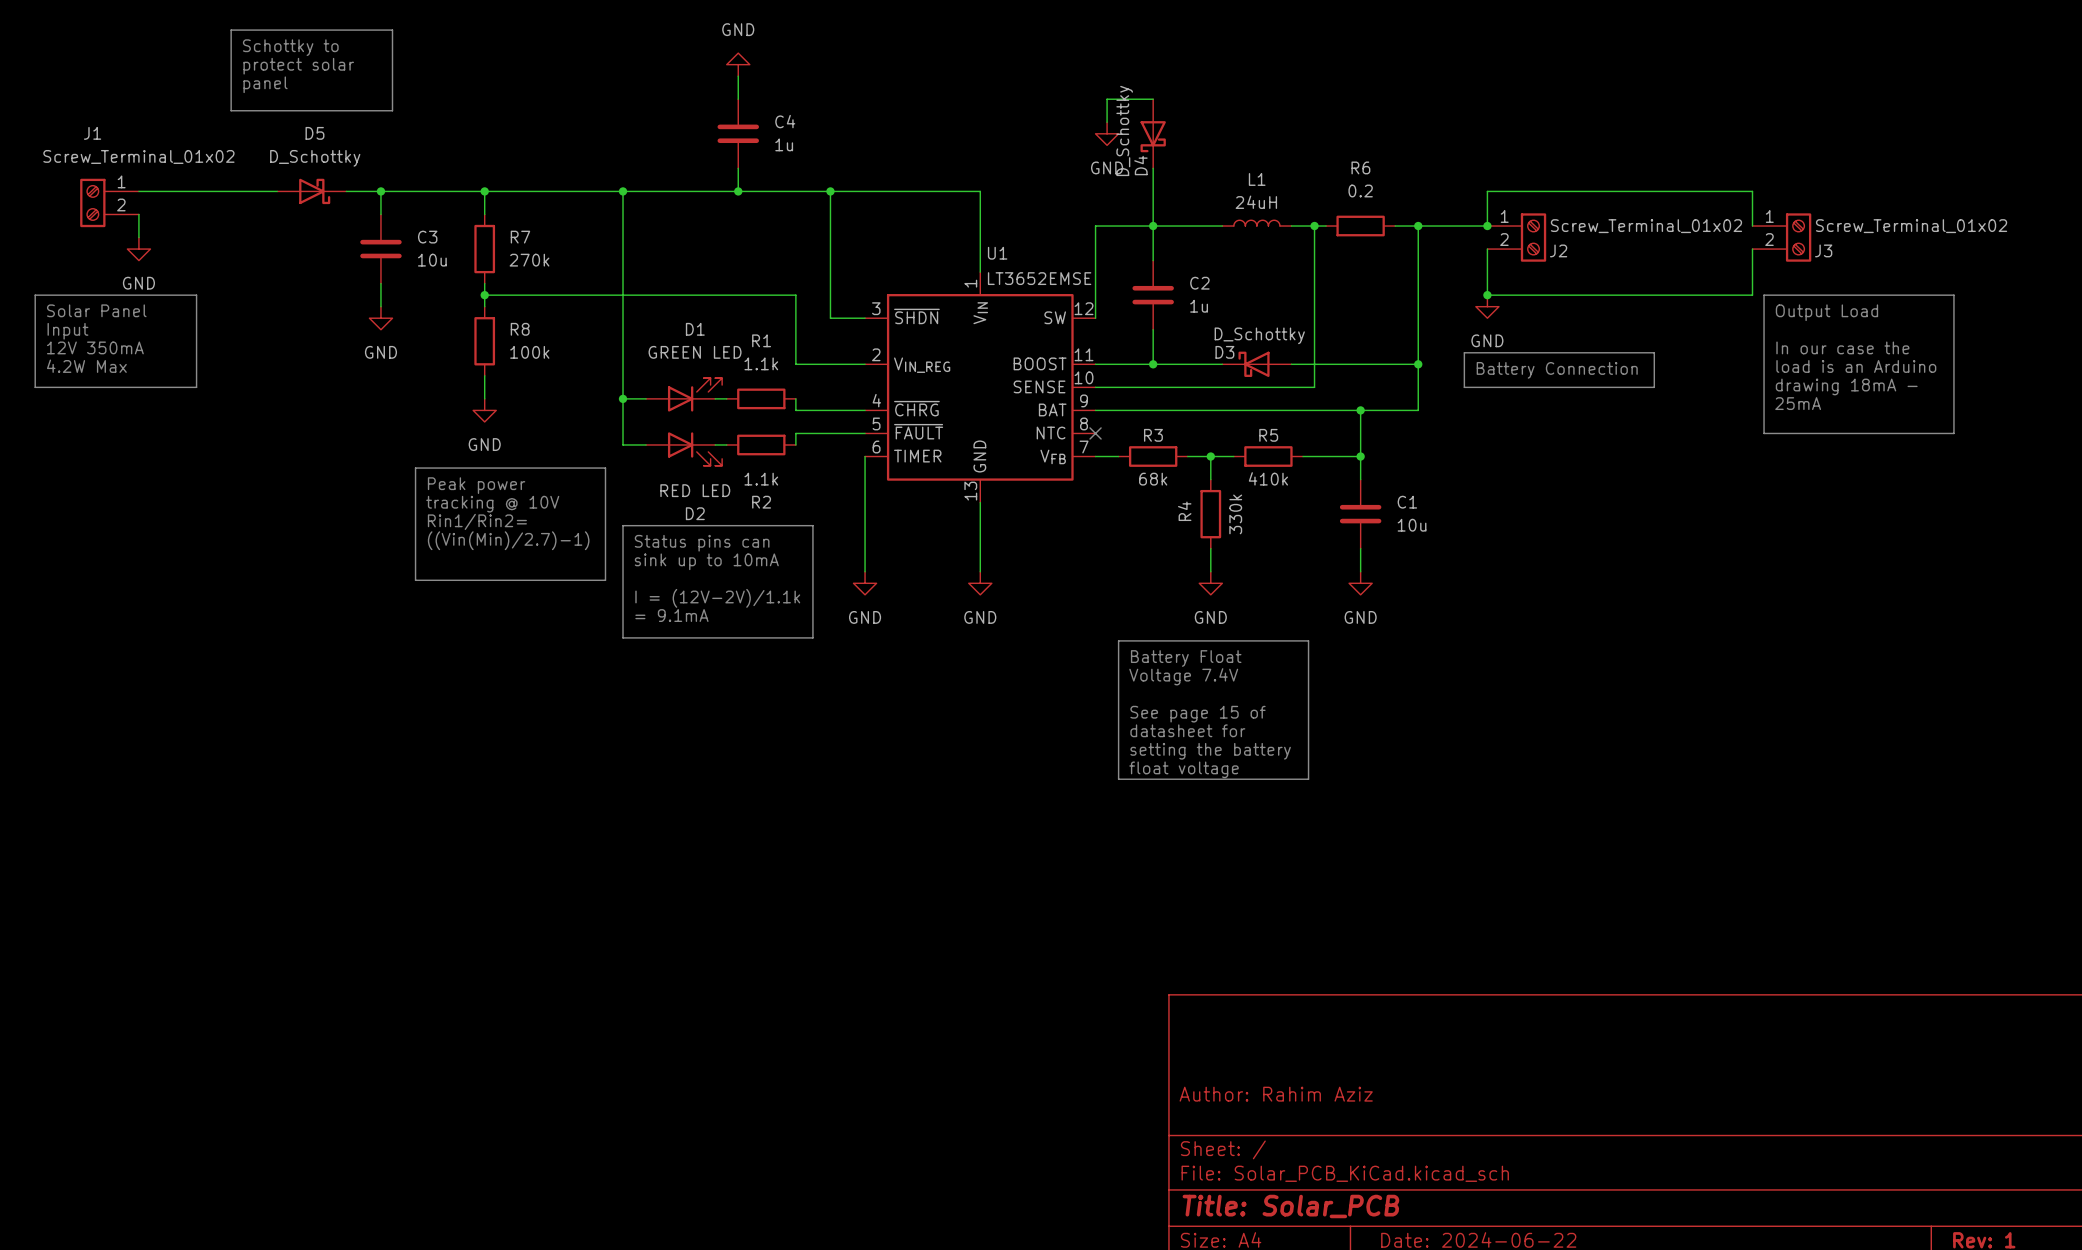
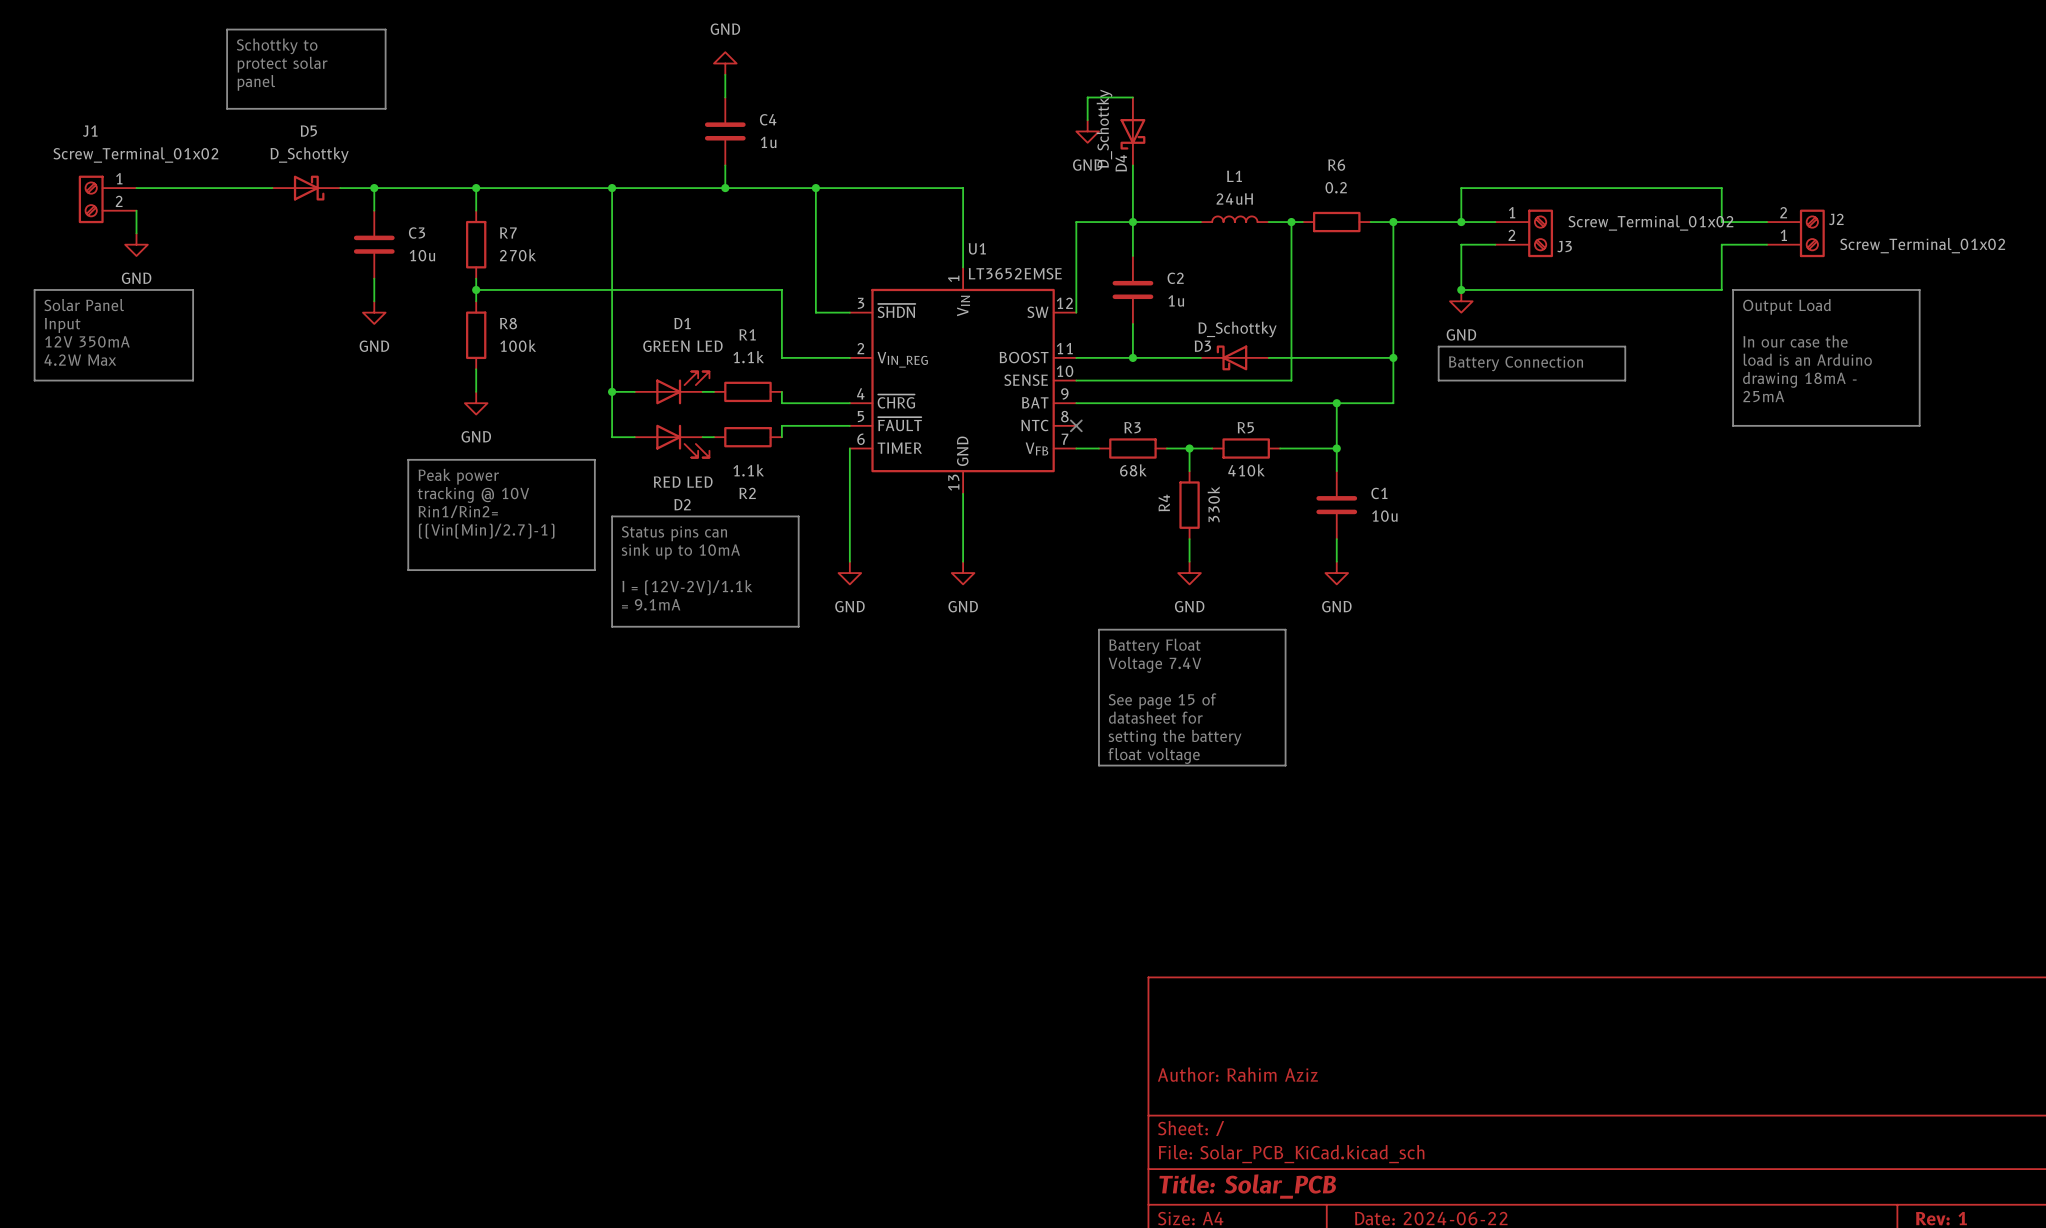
J2 position: (1516, 237) -> (1795, 233)
J2 flip: as is (1533, 237) -> up-down (1812, 233)
J3 position: (1781, 237) -> (1524, 233)

